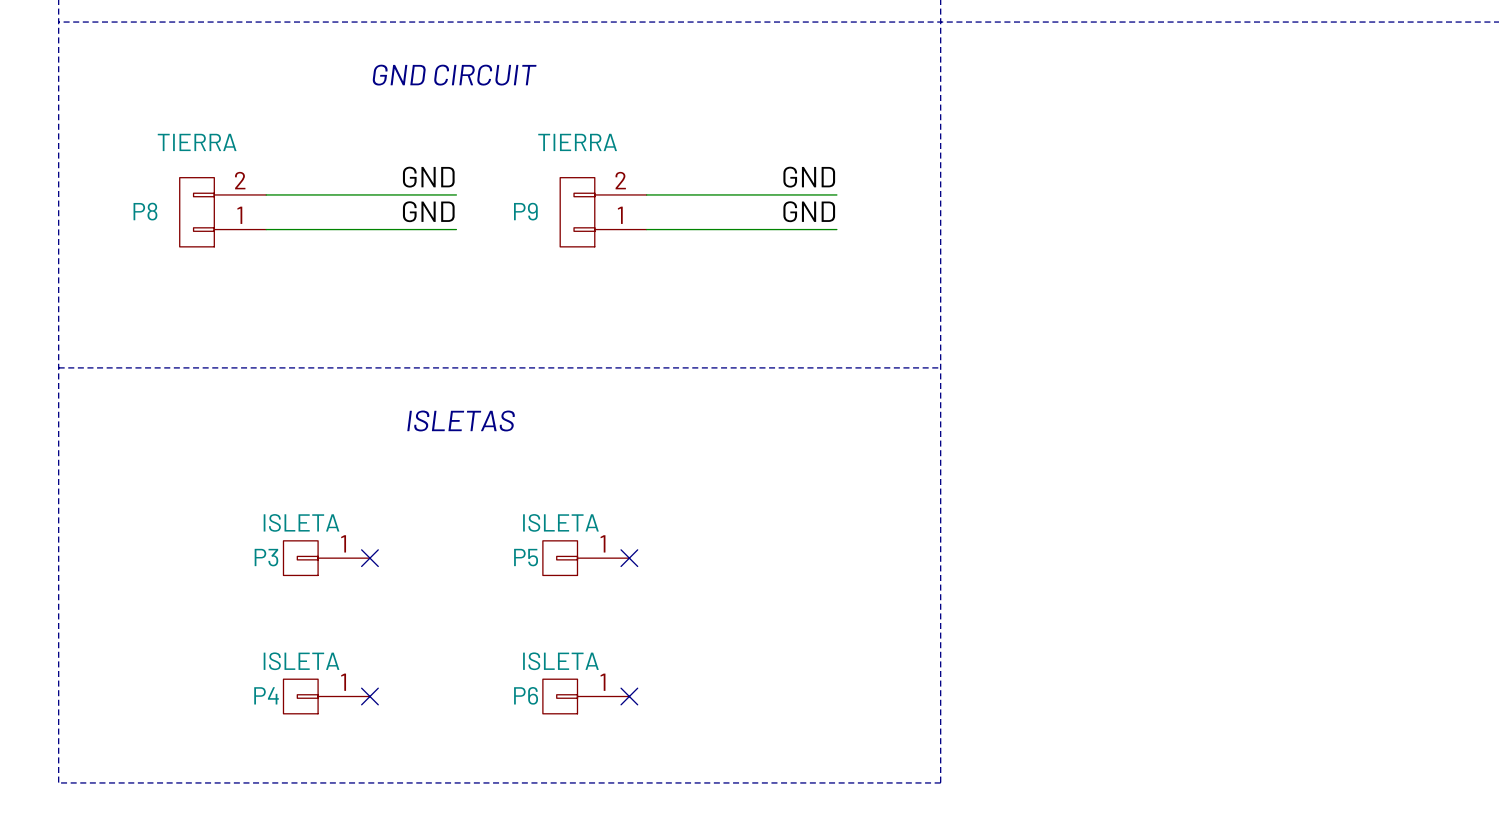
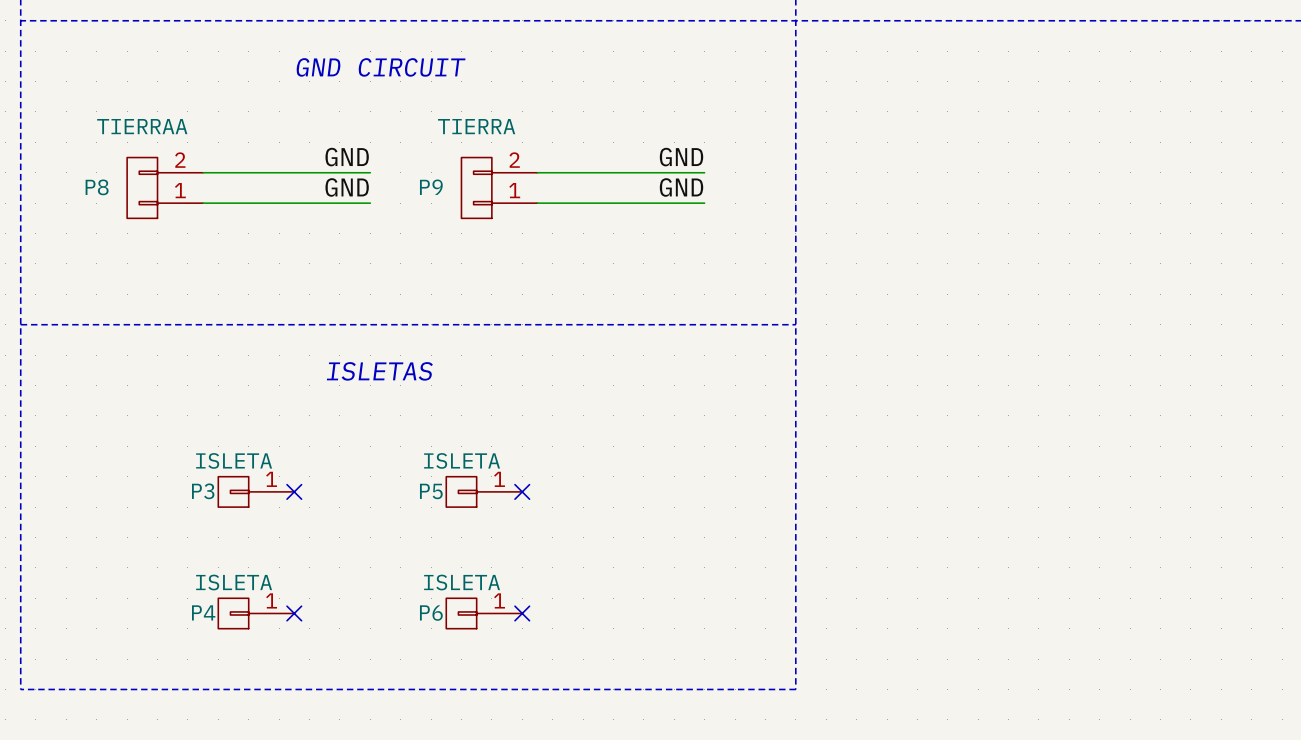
P8 value: TIERRA (197, 142) -> TIERRAA (142, 126)

